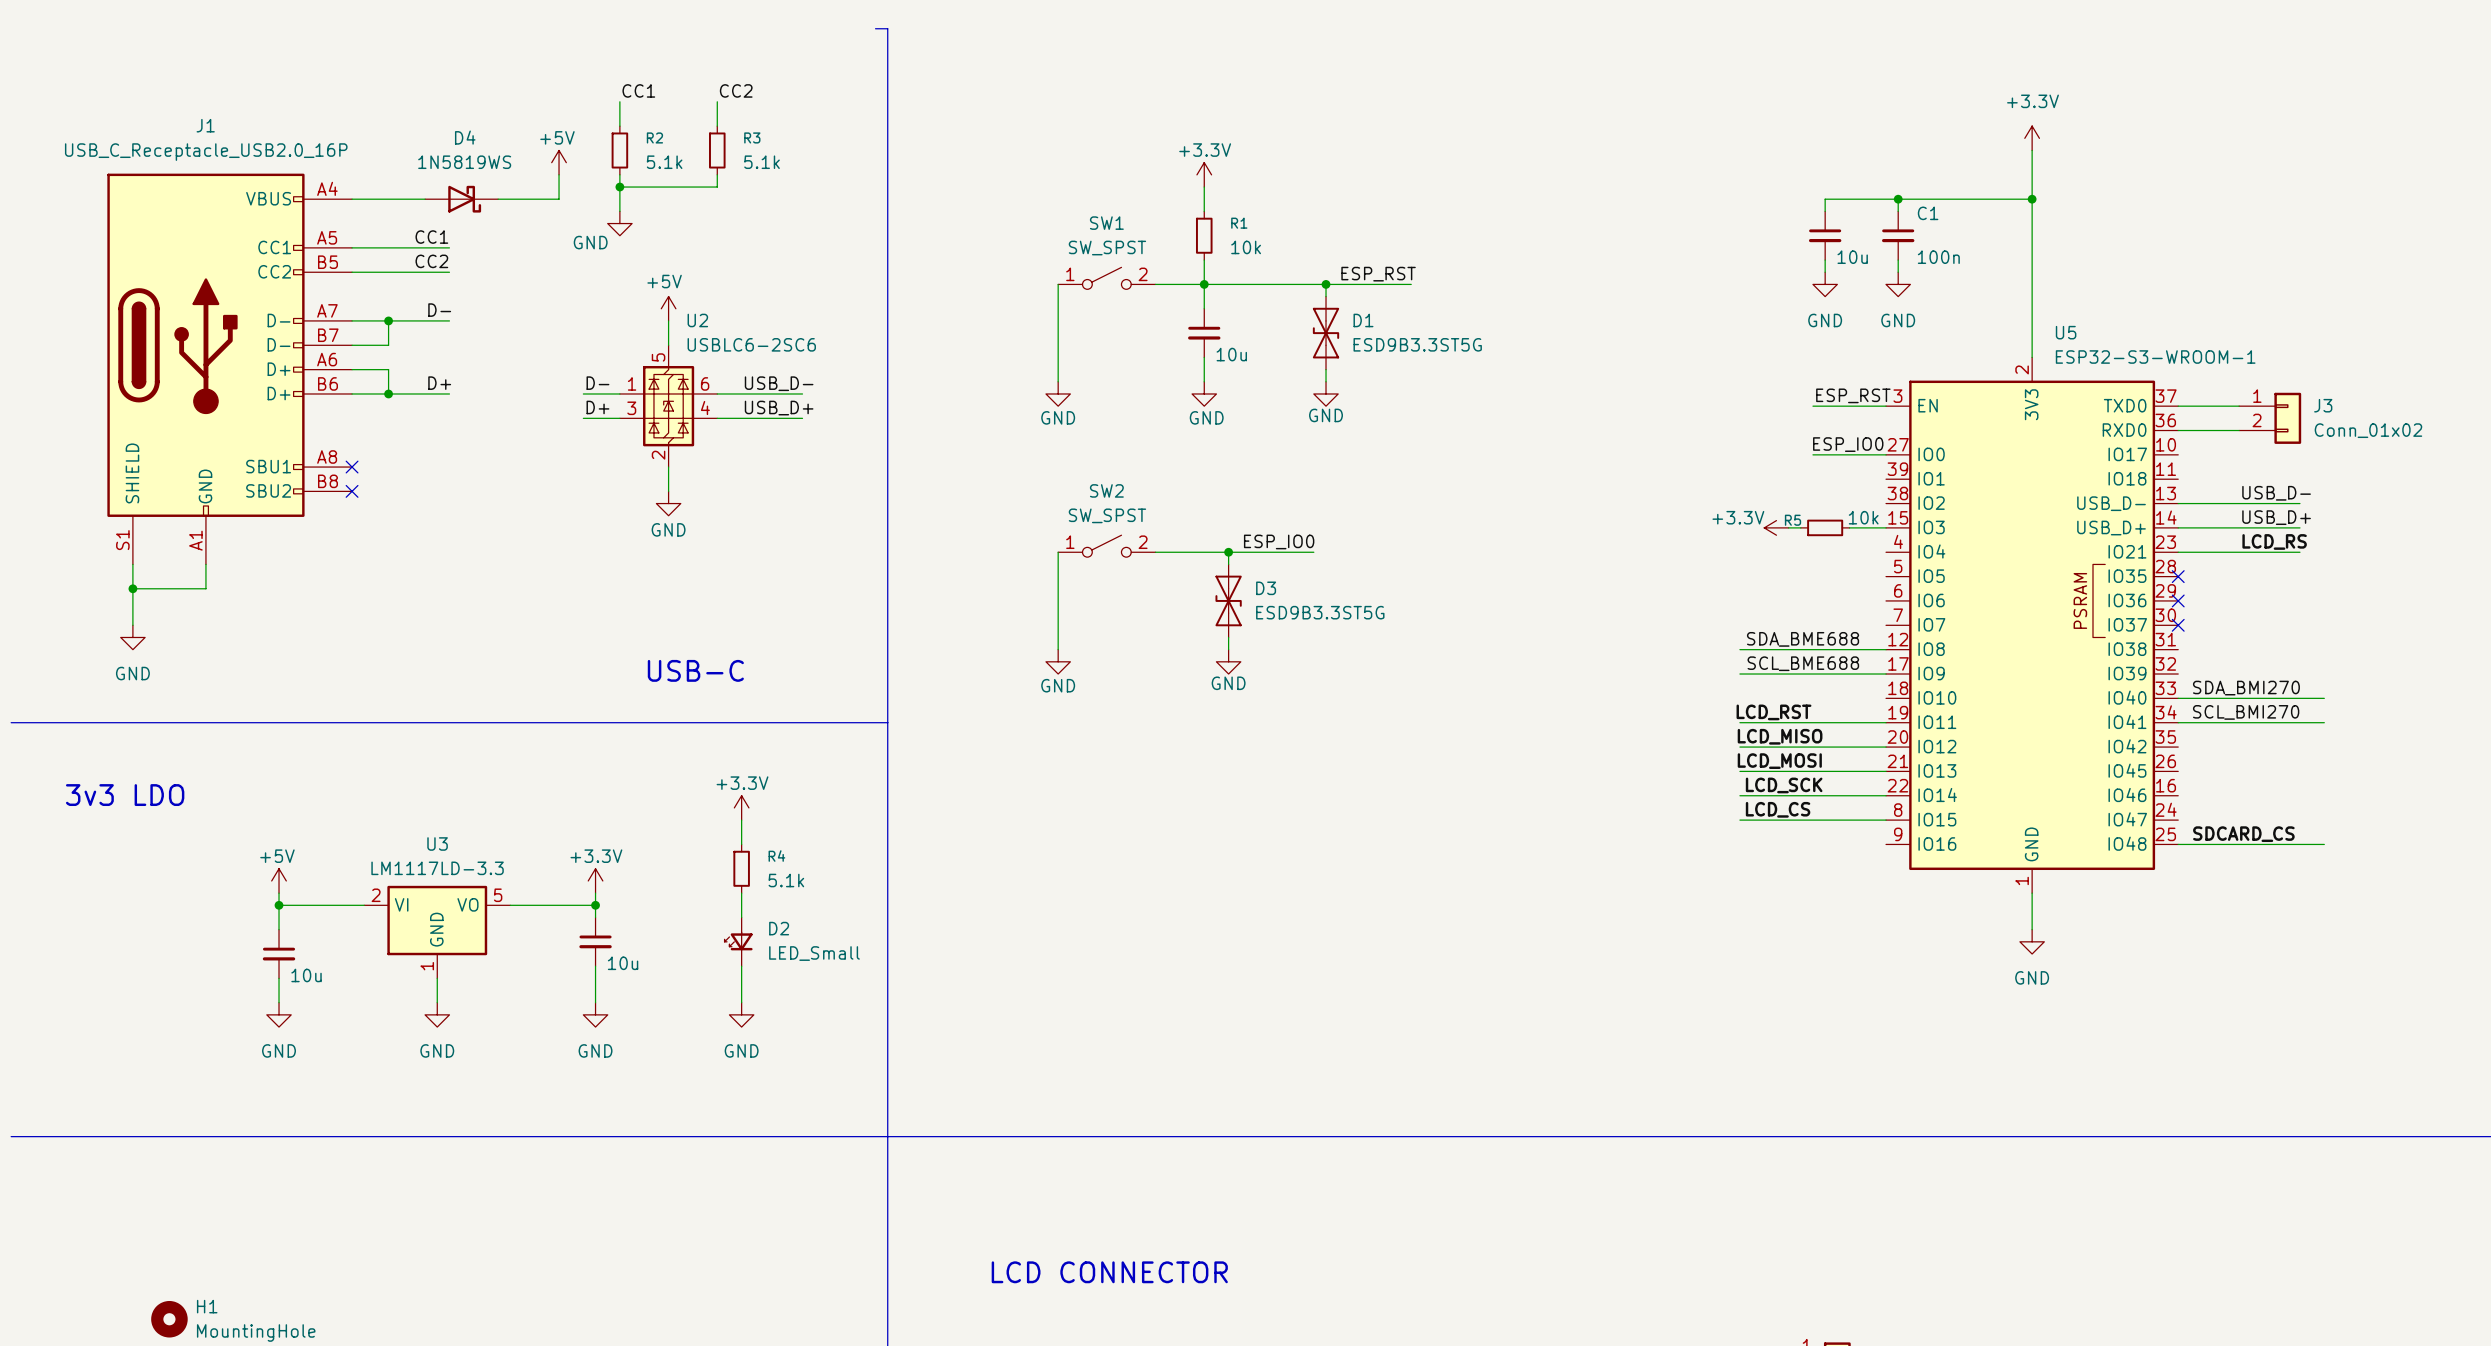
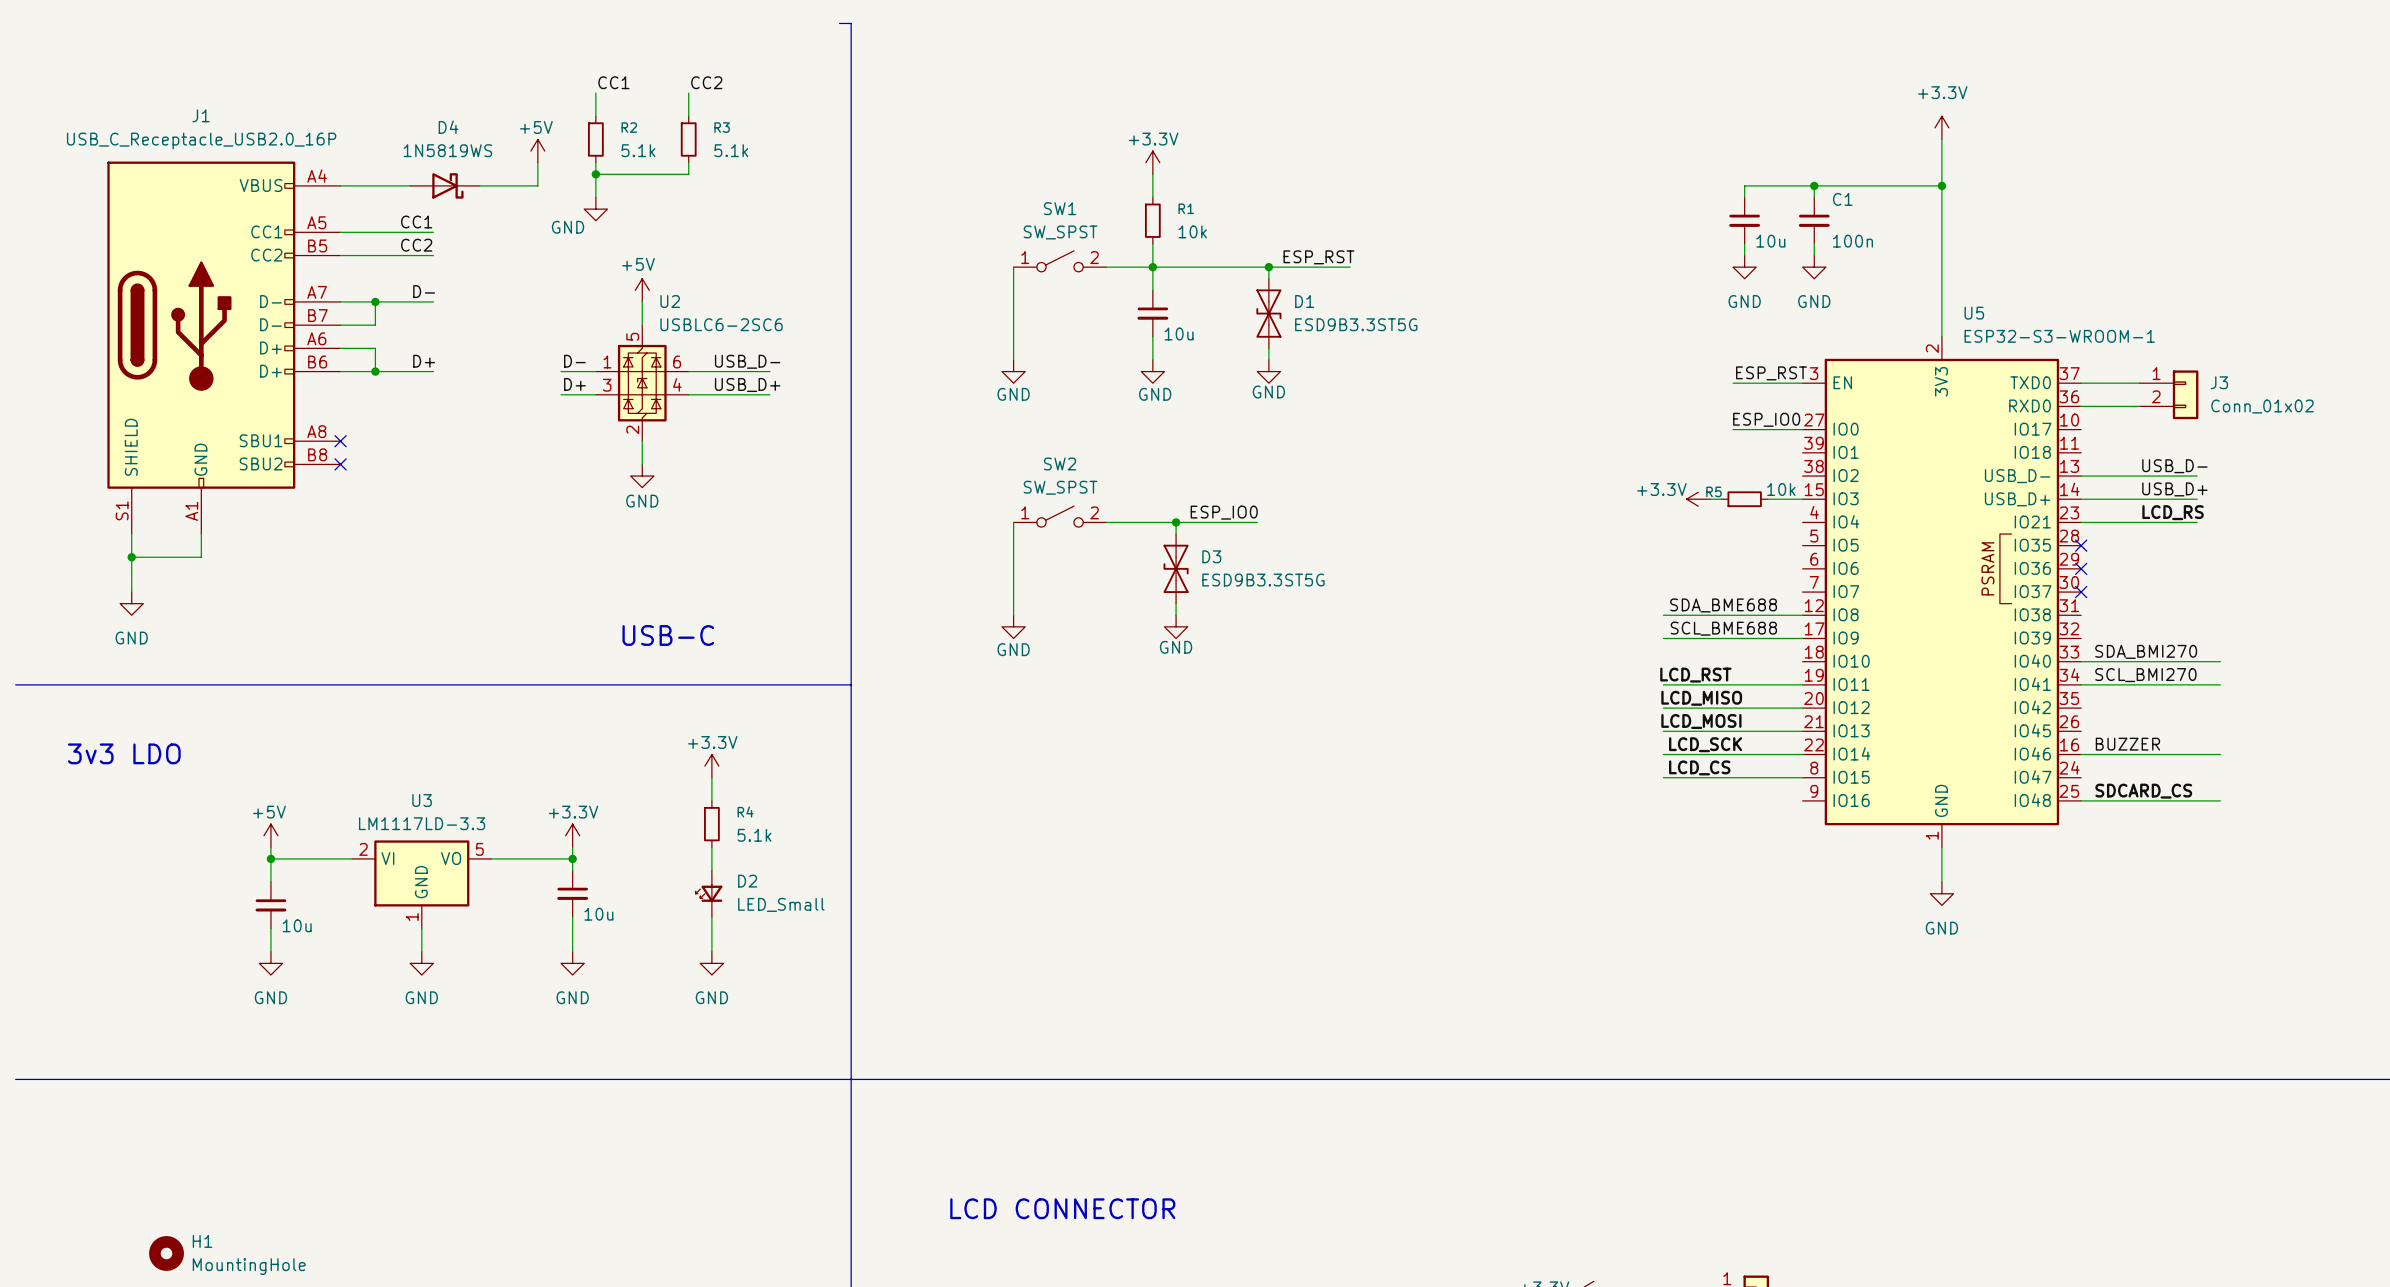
label: none -> BUZZER (2127, 744)
wire: none -> (2081, 754) (2220, 754)

